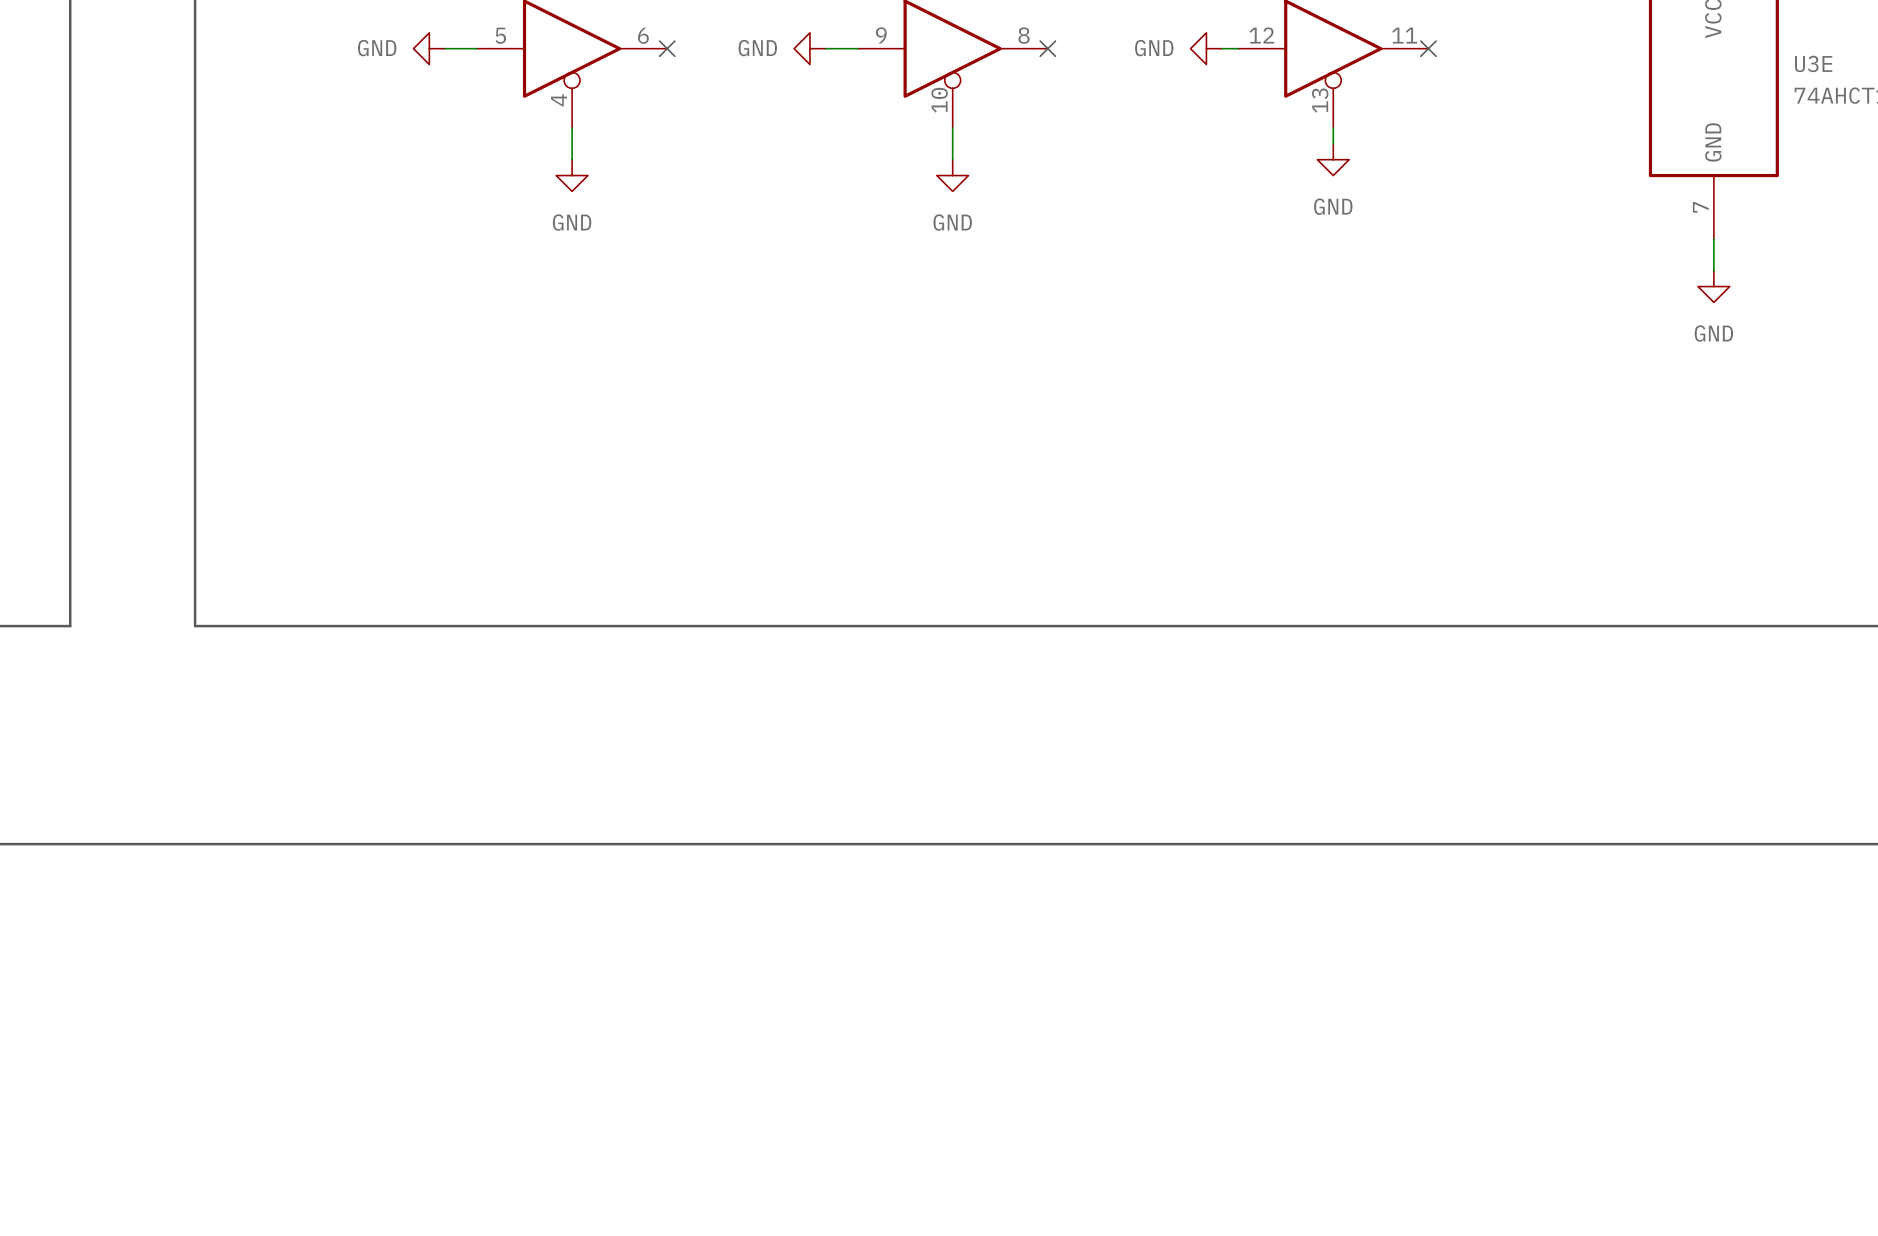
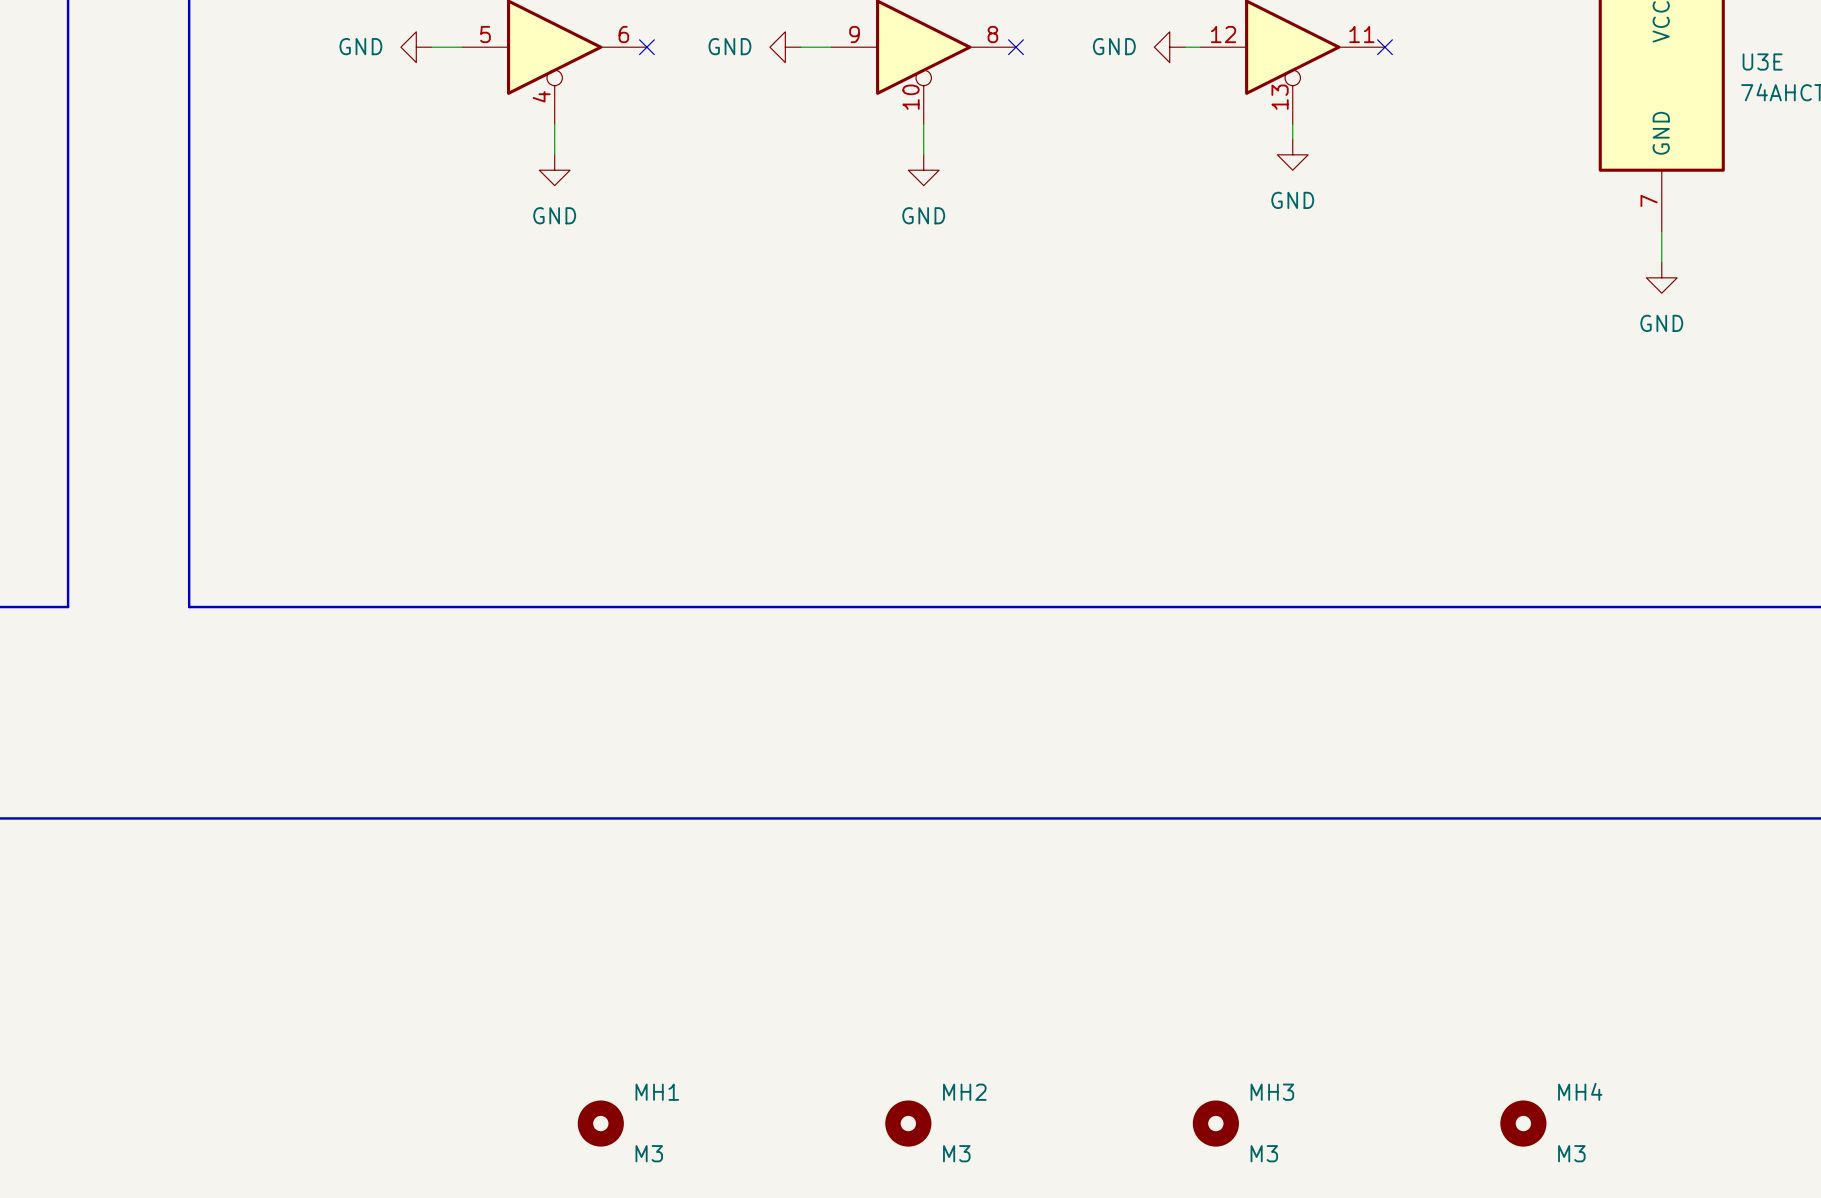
MH1: none -> M3 (600, 1123)
MH2: none -> M3 (908, 1123)
MH3: none -> M3 (1215, 1123)
MH4: none -> M3 (1523, 1123)

